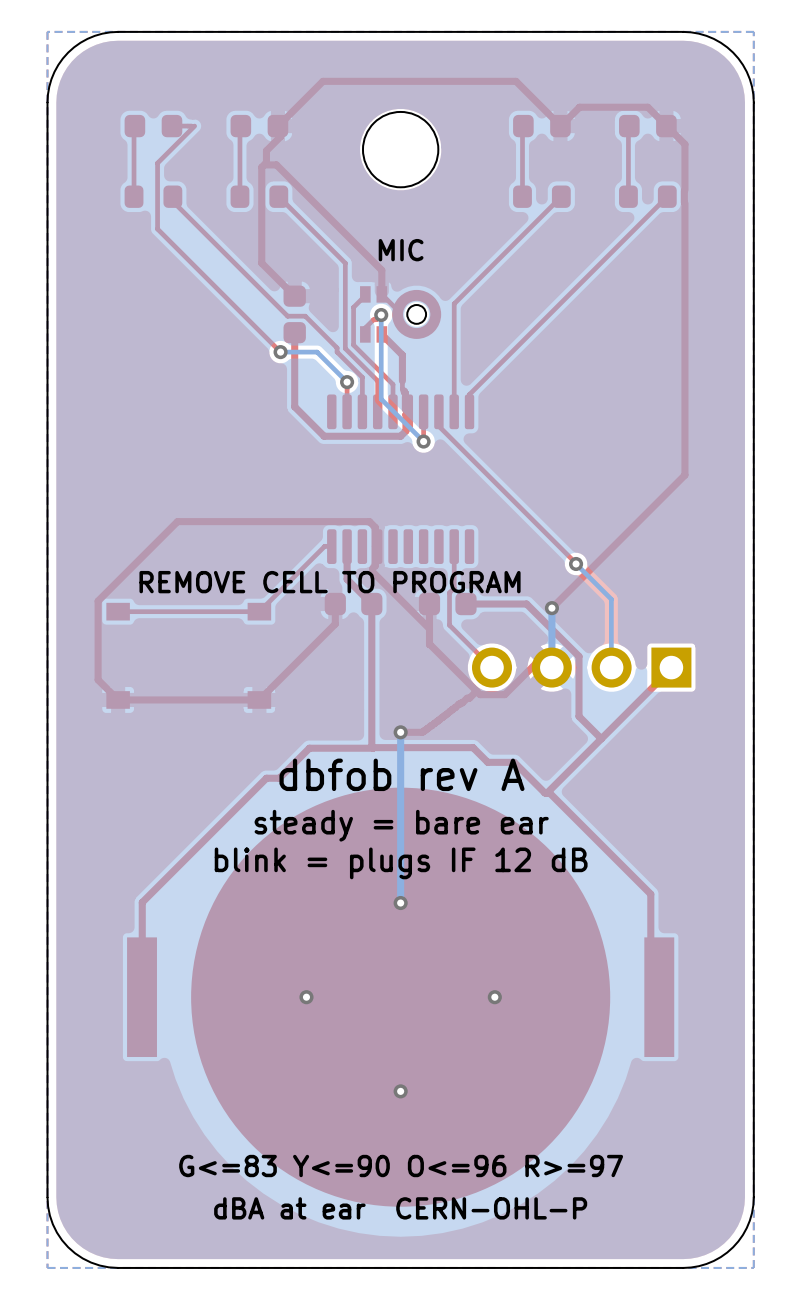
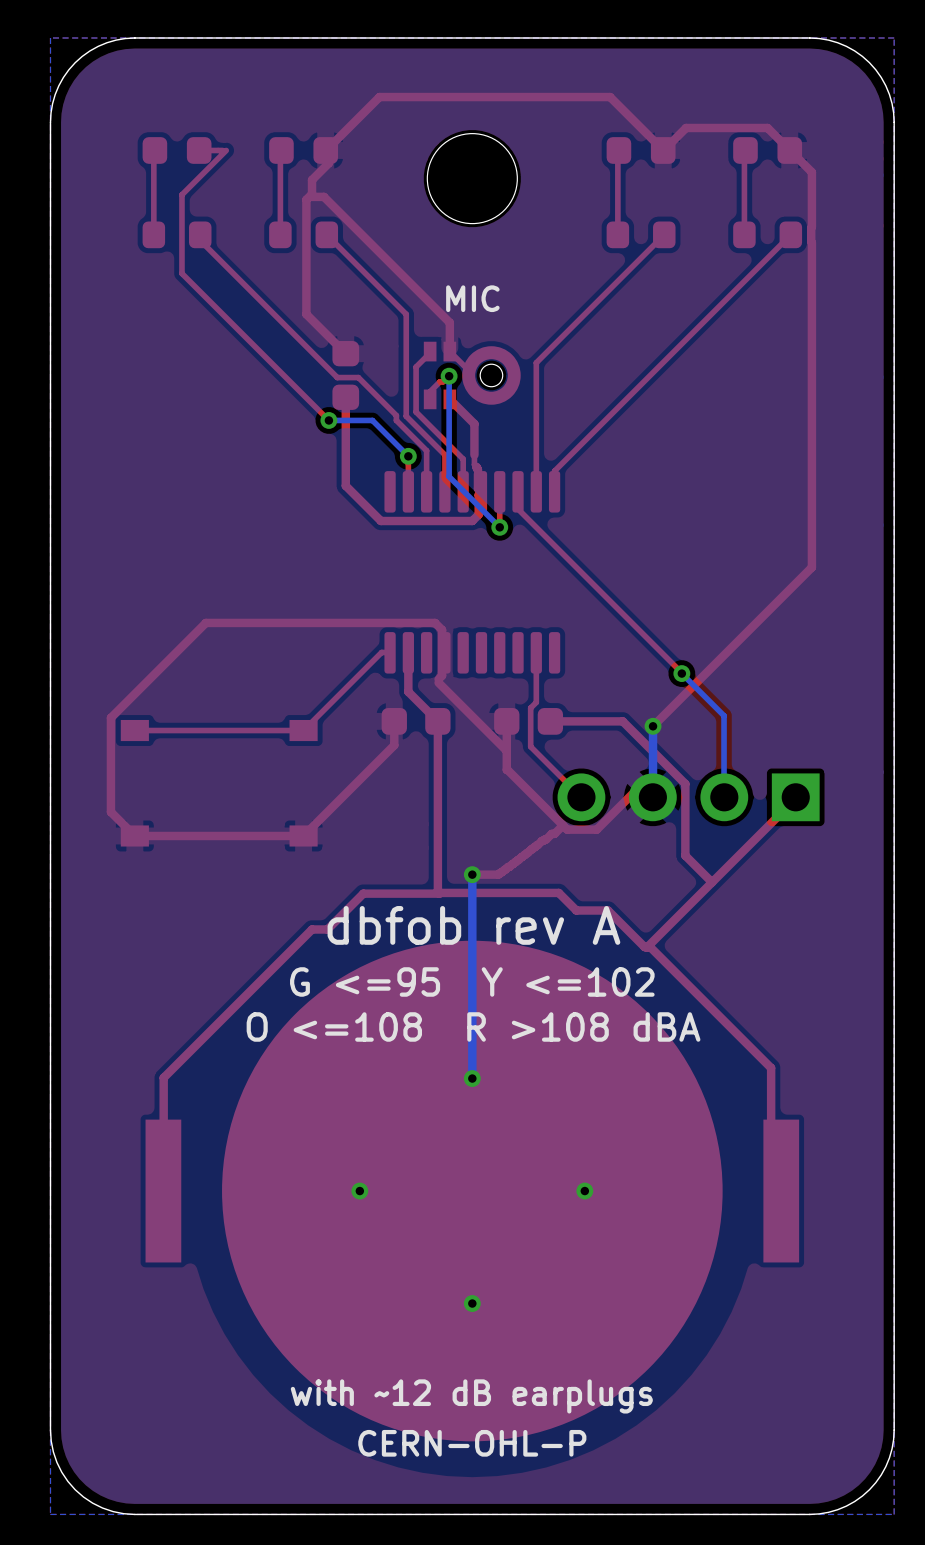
text: REMOVE CELL TO PROGRAM (330, 582) -> none
text: steady = bare ear (401, 825) -> G <=95 Y <=102 (472, 981)
text: blink = plugs IF 12 dB (401, 863) -> O <=108 R >108 dBA (473, 1026)
text: G<=83 Y<=90 O<=96 R>=97 (401, 1166) -> with ~12 dB earplugs (471, 1396)
text: dBA at ear CERN-OHL-P (400, 1208) -> CERN-OHL-P (472, 1443)

